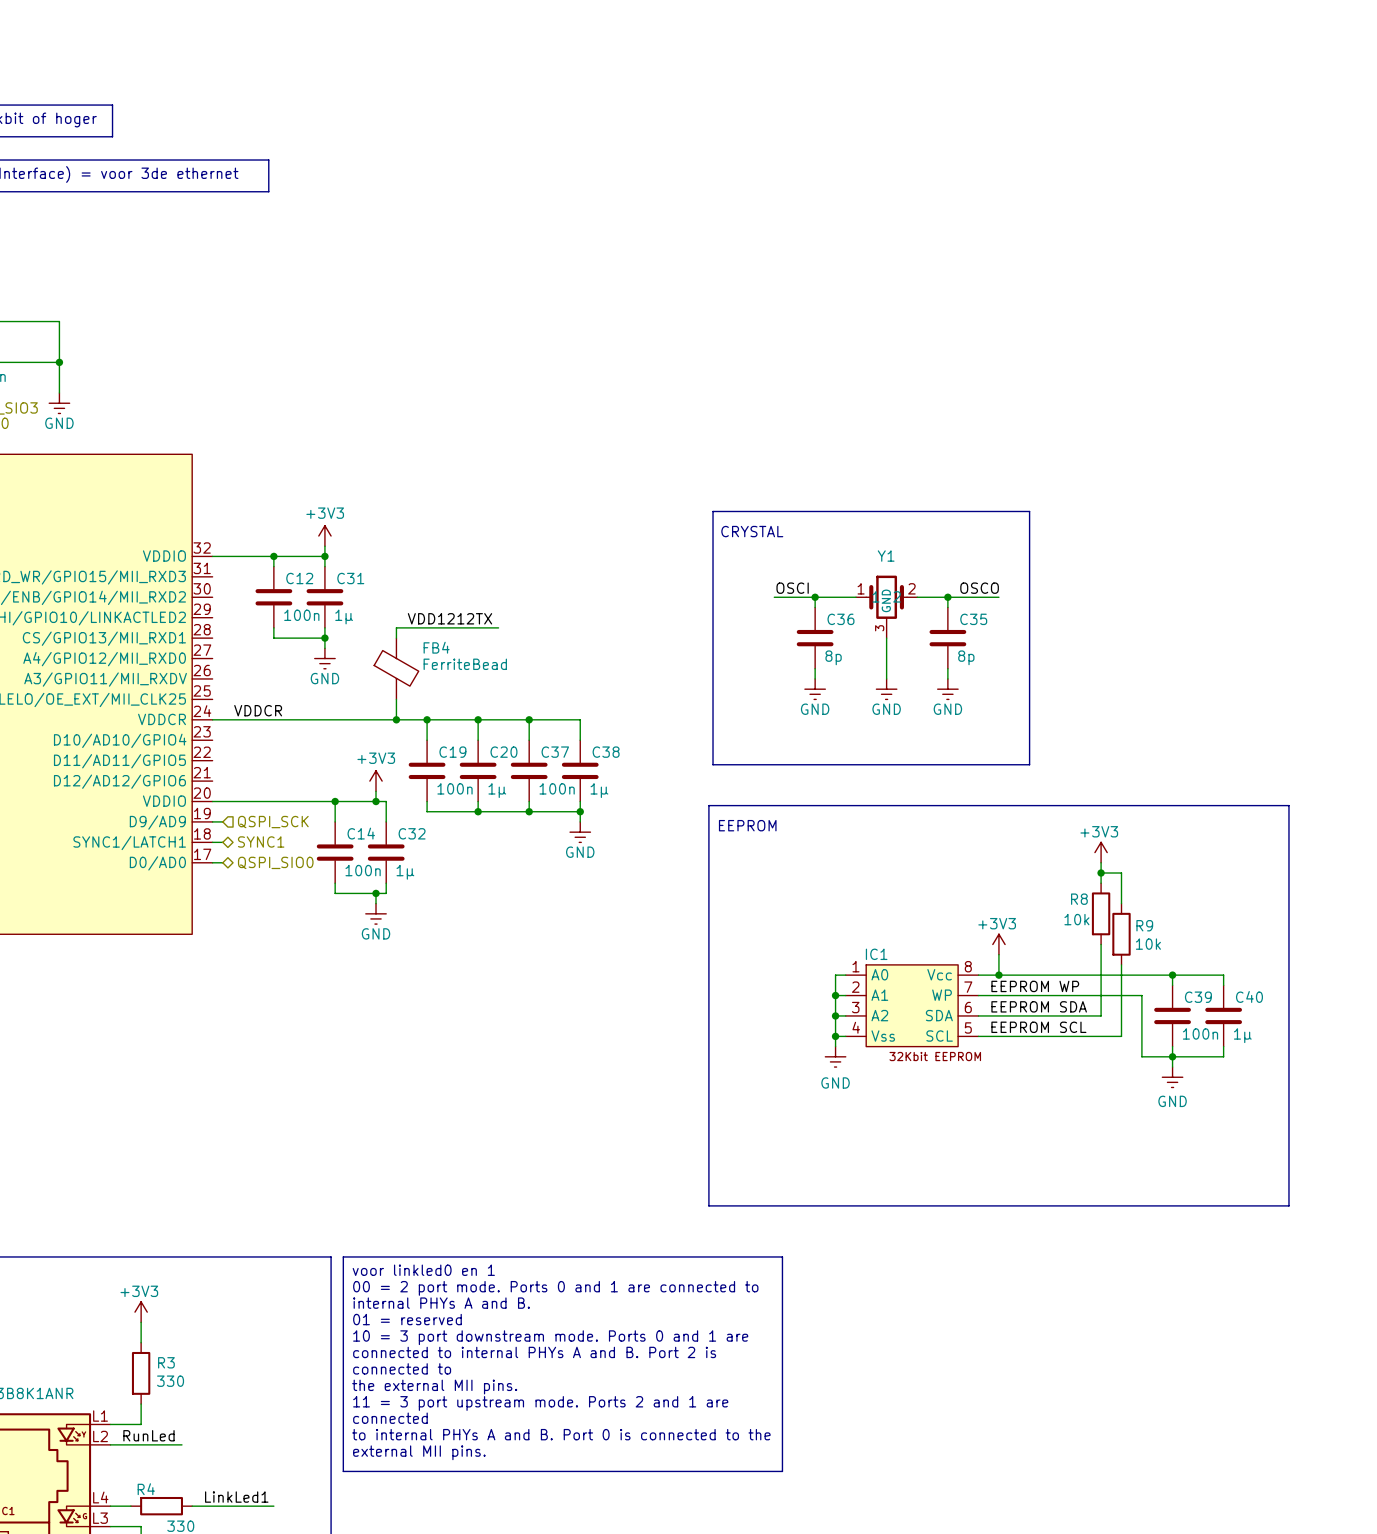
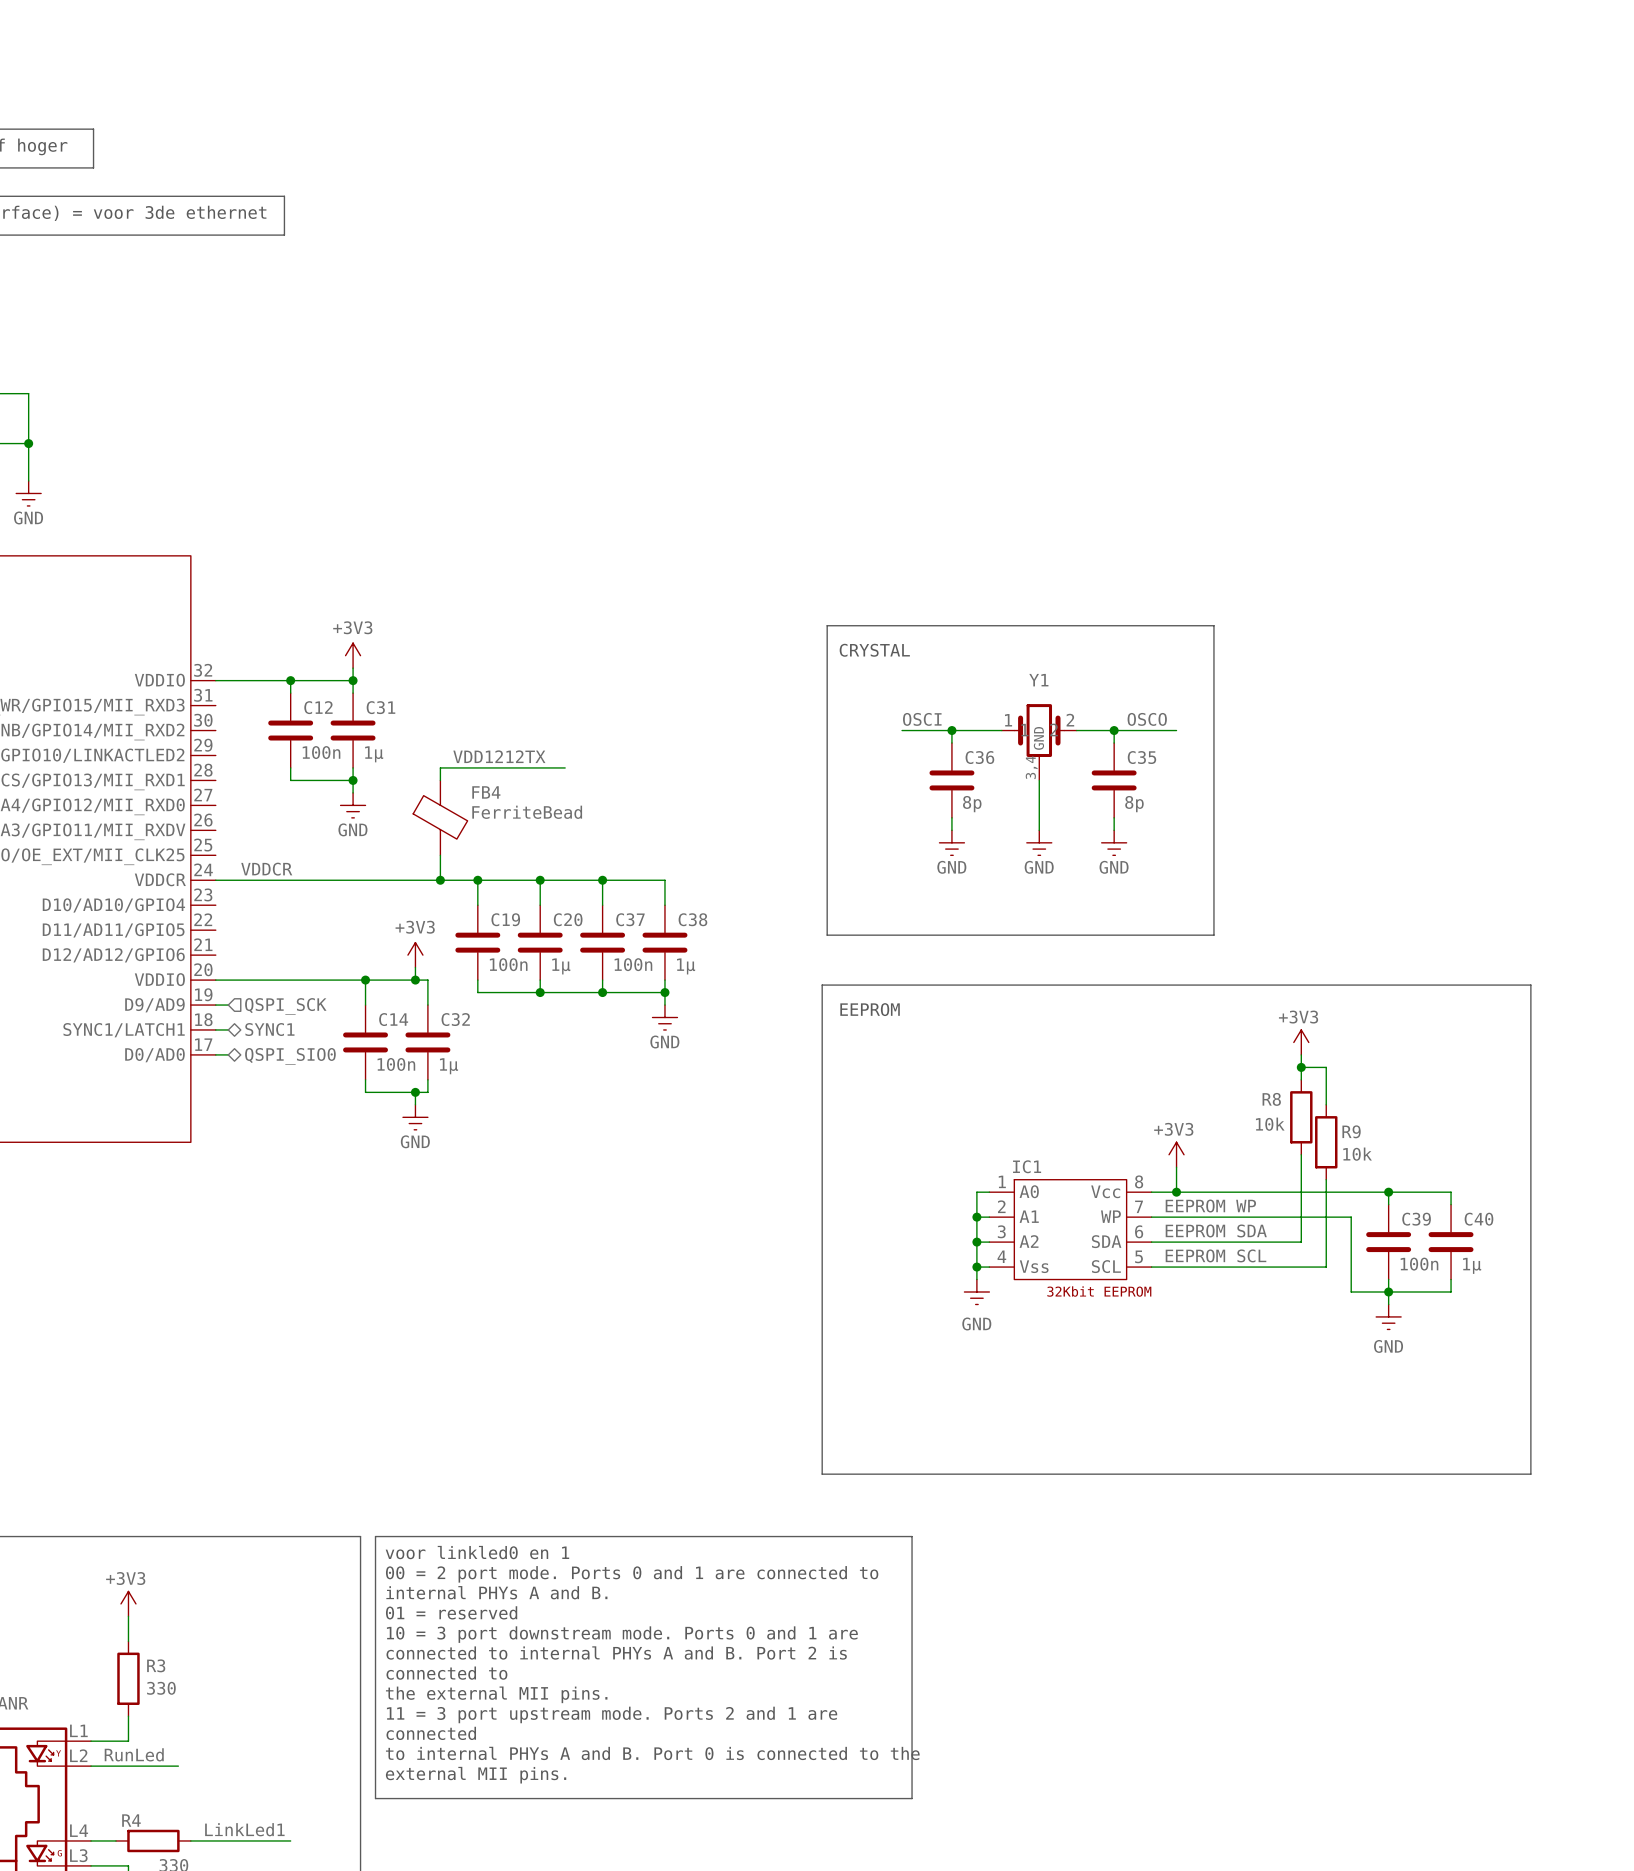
Y1 symbol: [855, 575, 918, 639] -> [1001, 704, 1077, 781]

